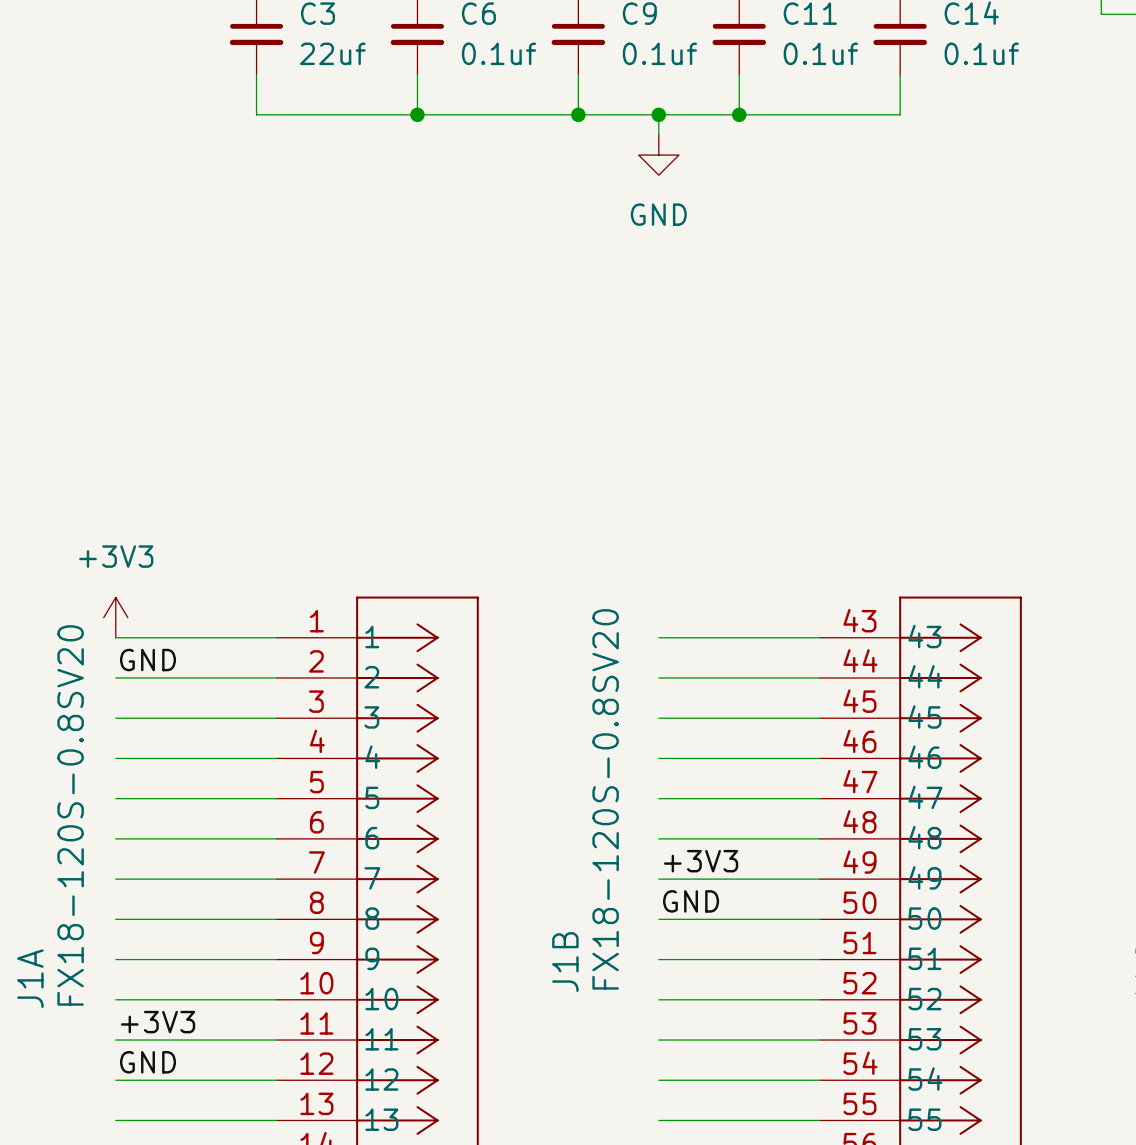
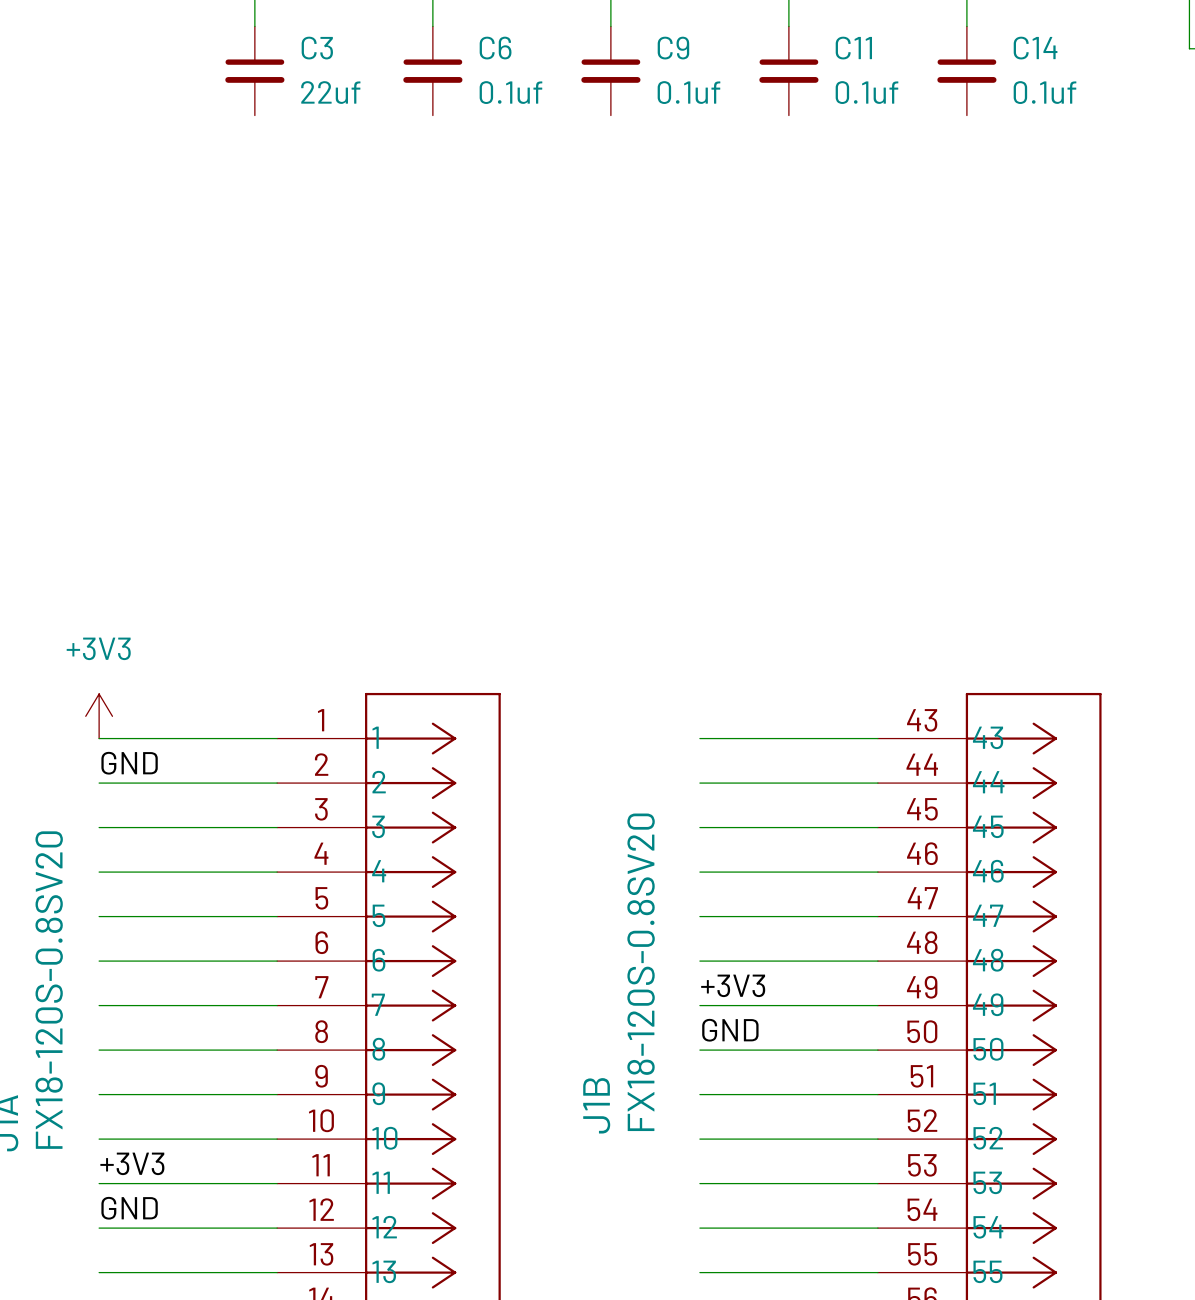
wire: (256, 74) (256, 114) (900, 114) (900, 74) -> none
wire: (417, 74) (417, 114) -> none
wire: (578, 74) (578, 114) -> none
wire: (739, 74) (739, 114) -> none
junction: (417, 114) -> none
junction: (578, 114) -> none
wire: (658, 114) (658, 134) -> none
junction: (658, 114) -> none
junction: (739, 114) -> none
power symbol: GND (658, 155) -> none

